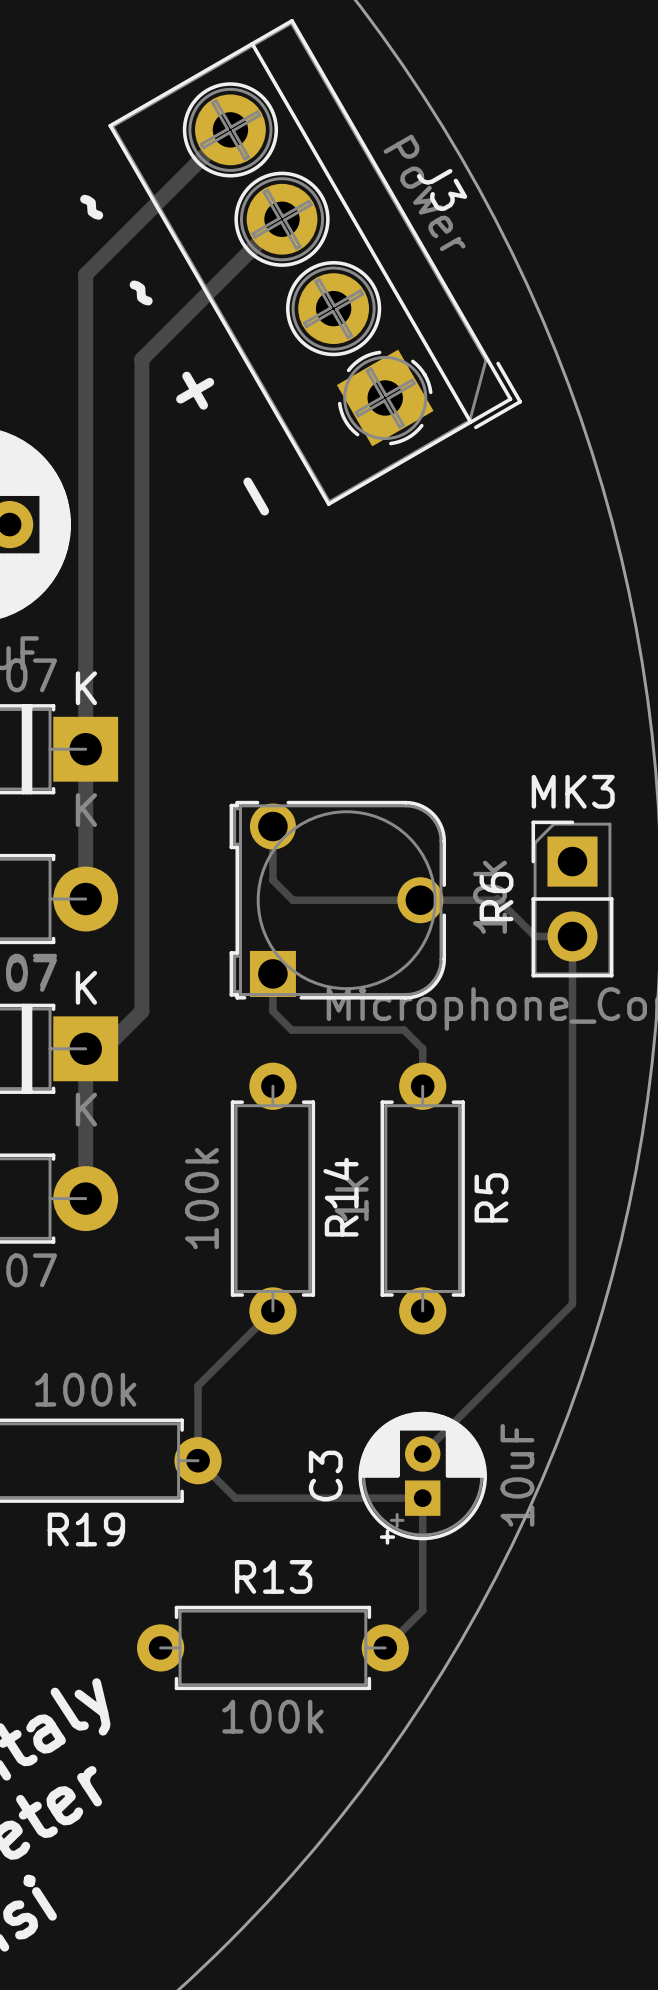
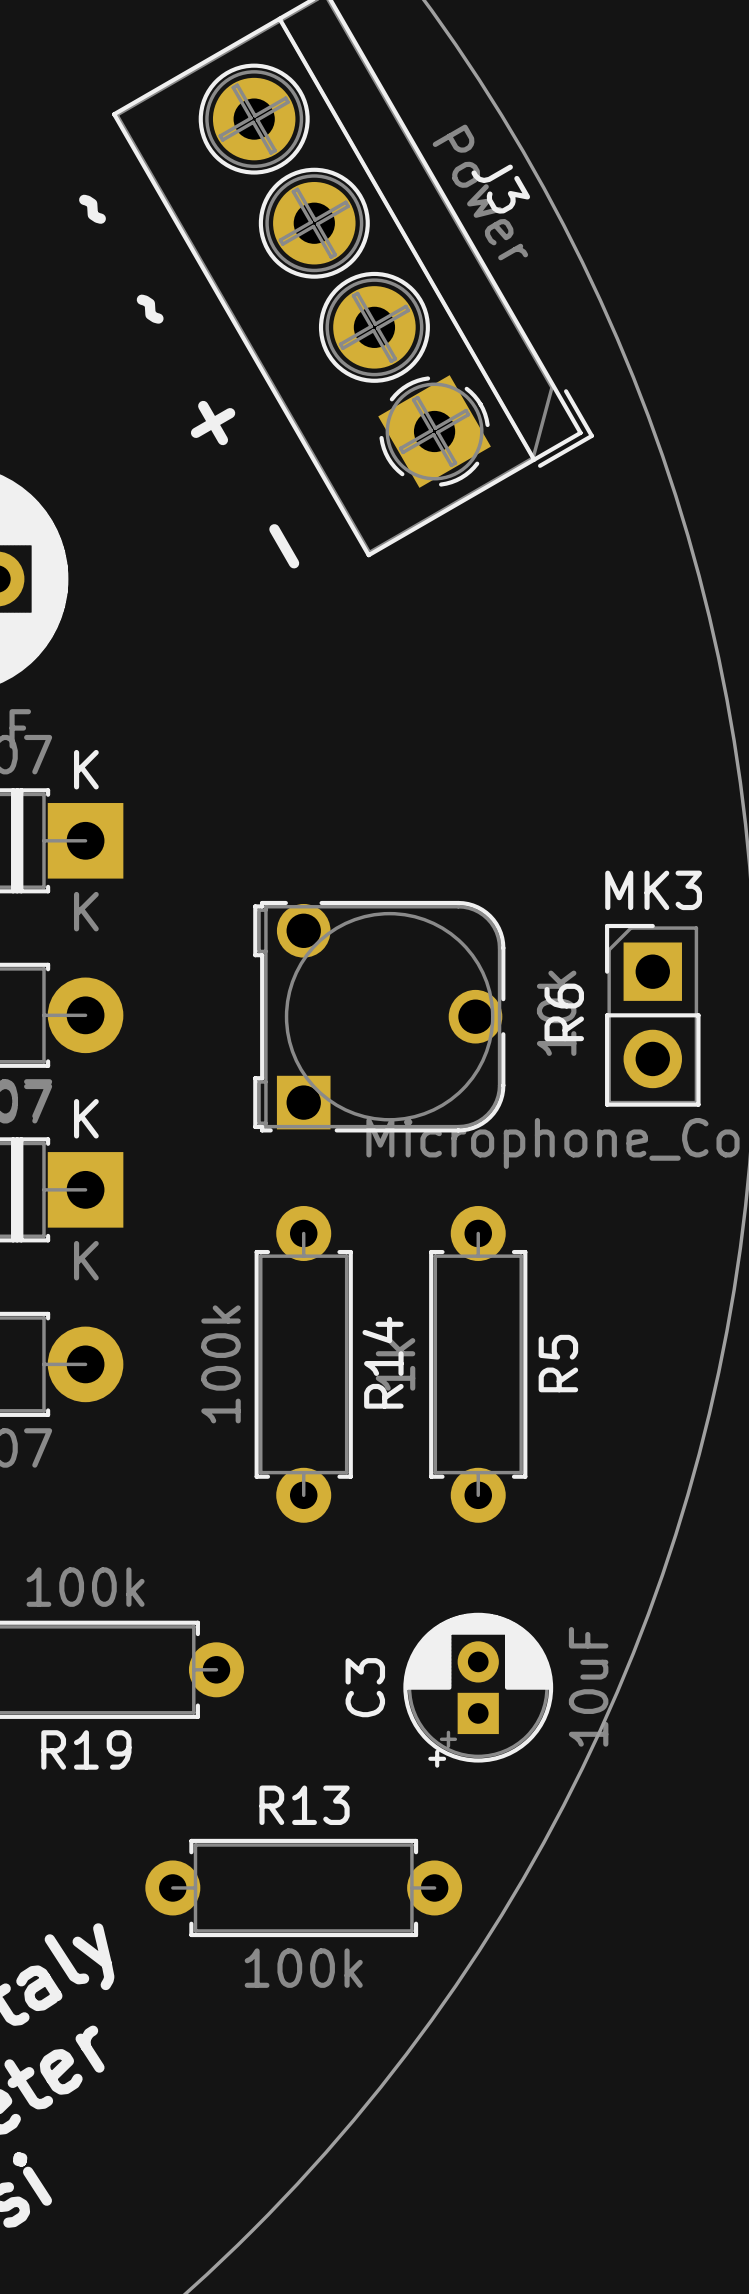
track: (230, 129) (85, 274) (85, 899) -> none
track: (282, 219) (141, 359) (141, 1011) (104, 1048) (85, 1048) (85, 1198) -> none
track: (272, 826) (272, 880) (292, 900) (497, 899) (535, 936) (572, 936) (572, 1304) (422, 1453) -> none
track: (272, 973) (272, 1011) (291, 1030) (403, 1030) (422, 1048) (422, 1086) -> none
track: (272, 1310) (198, 1385) (198, 1460) (235, 1498) (422, 1498) (422, 1610) (385, 1647) -> none

